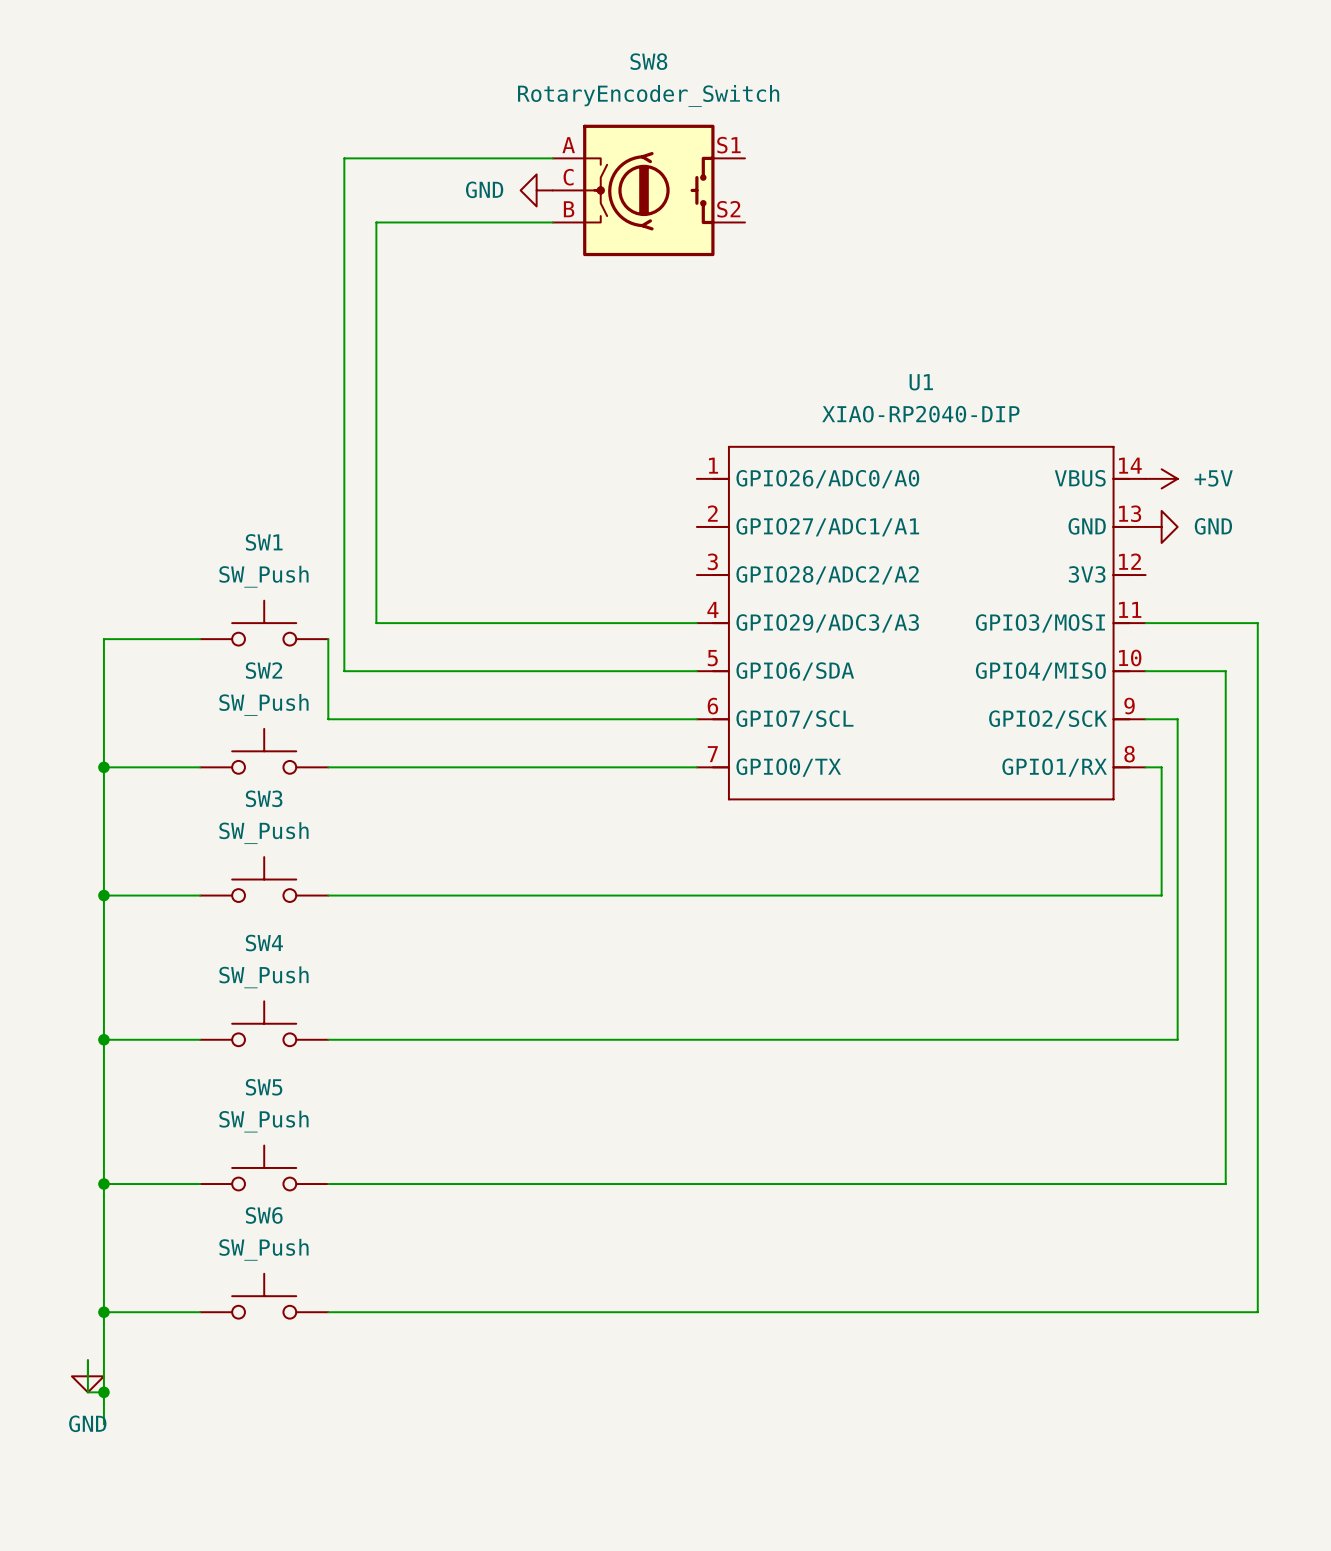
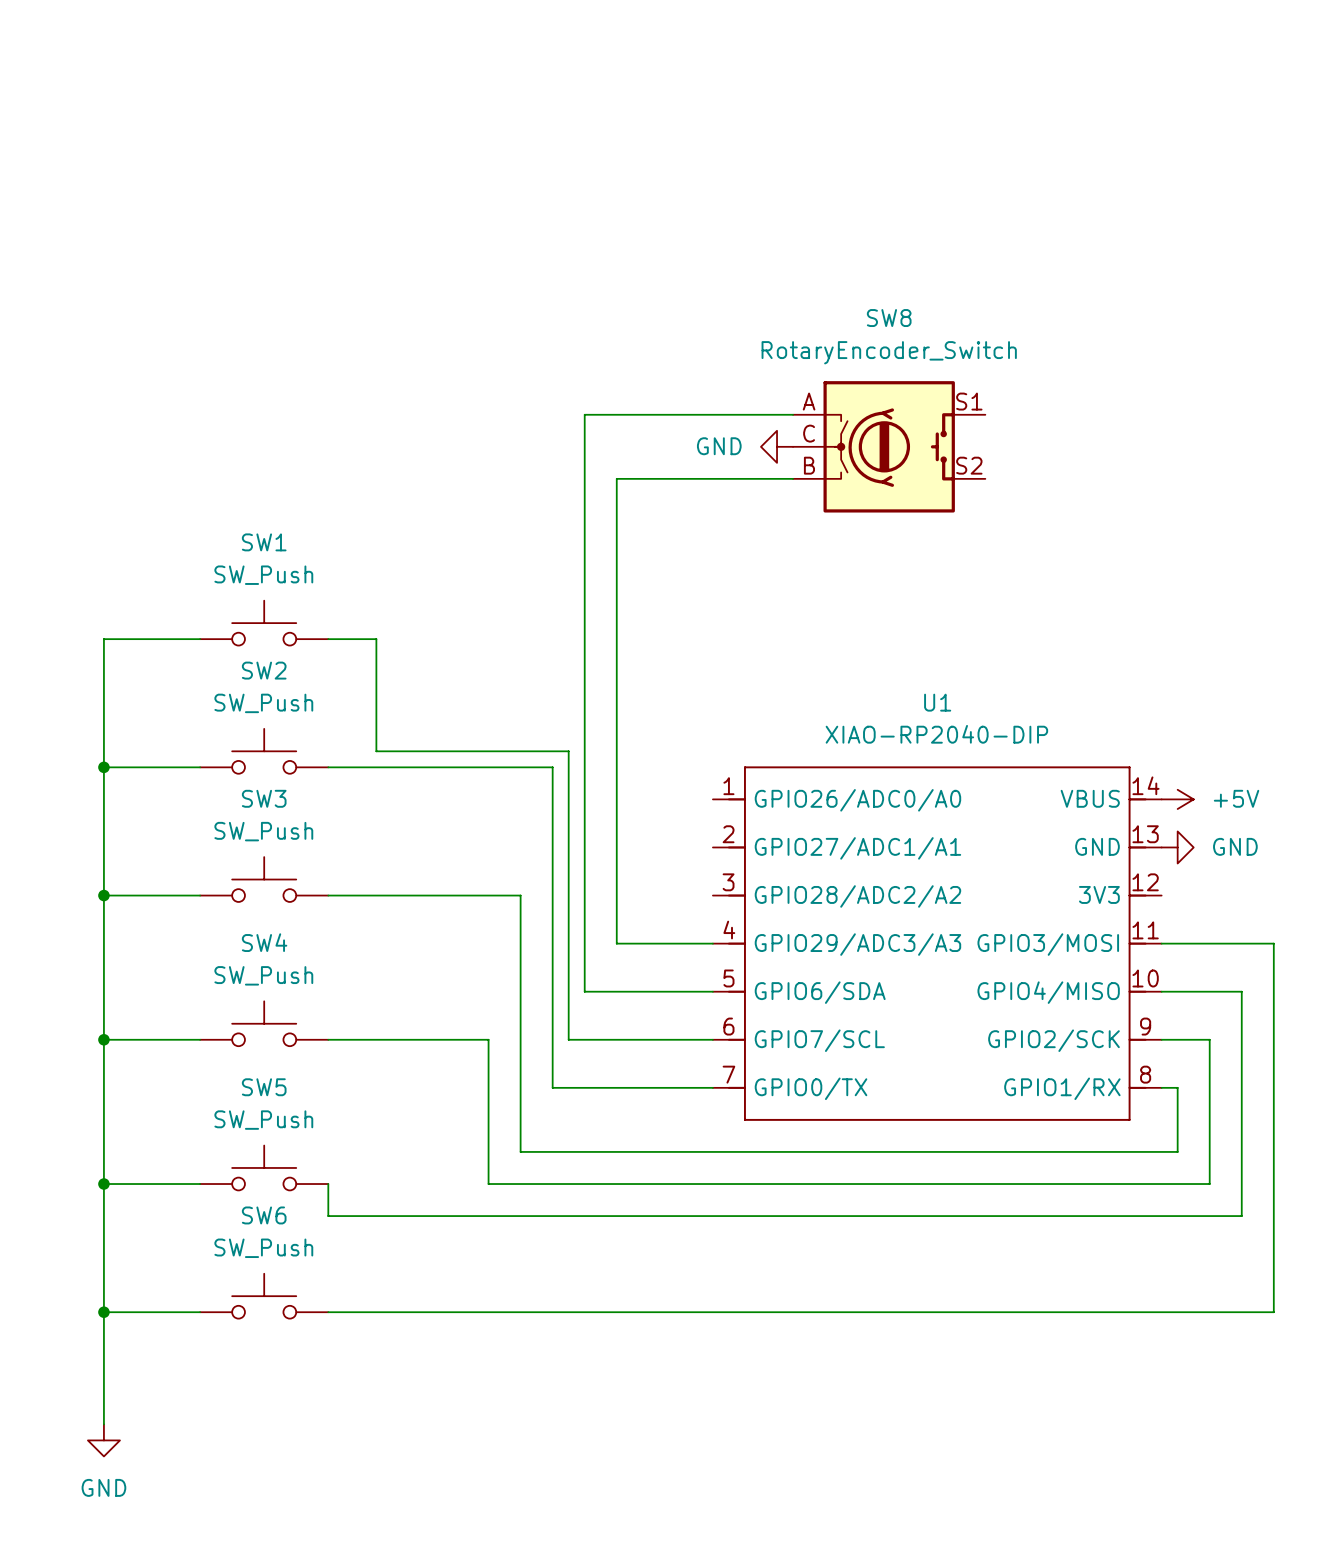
wire: (552, 158) (344, 158) (344, 671) (696, 671) -> none
power symbol: GND (536, 190) -> none
SW8 position: (648, 190) -> (889, 446)
wire: (552, 222) (376, 222) (376, 623) (696, 623) -> none
wire: none -> (793, 414) (584, 414) (584, 991) (712, 991)
power symbol: none -> GND (777, 446)
wire: none -> (793, 478) (616, 478) (616, 943) (712, 943)
power symbol: +5V (1161, 478) -> none
power symbol: GND (1161, 526) -> none
U1 position: (921, 623) -> (937, 943)
wire: (1145, 623) (1257, 623) (1257, 1312) -> (1161, 943) (1273, 943) (1273, 1312) (1257, 1312)
wire: (328, 639) (328, 719) (696, 719) -> (328, 639) (376, 639) (376, 751) (568, 751) (568, 1039)
wire: (1145, 671) (1225, 671) (1225, 1184) (1209, 1184) -> (1177, 1039) (1209, 1039) (1209, 1184)
wire: (1145, 719) (1177, 719) (1177, 1039) -> none
wire: (552, 767) (696, 767) -> (552, 767) (552, 1087) (712, 1087)
wire: (1145, 767) (1161, 767) (1161, 895) (520, 895) -> (1161, 1087) (1177, 1087) (1177, 1151) (520, 1151) (520, 895)
power symbol: none -> +5V (1177, 799)
power symbol: none -> GND (1177, 847)
wire: (488, 1039) (568, 1039) -> (488, 1039) (488, 1184)
wire: (712, 1039) (1161, 1039) -> none
wire: (328, 1184) (488, 1184) -> (328, 1184) (328, 1216) (1241, 1216) (1241, 991) (1161, 991)
wire: (87, 1360) (87, 1392) (103, 1392) -> none
power symbol position: GND (87, 1376) -> GND (103, 1440)
junction: (103, 1392) -> none

